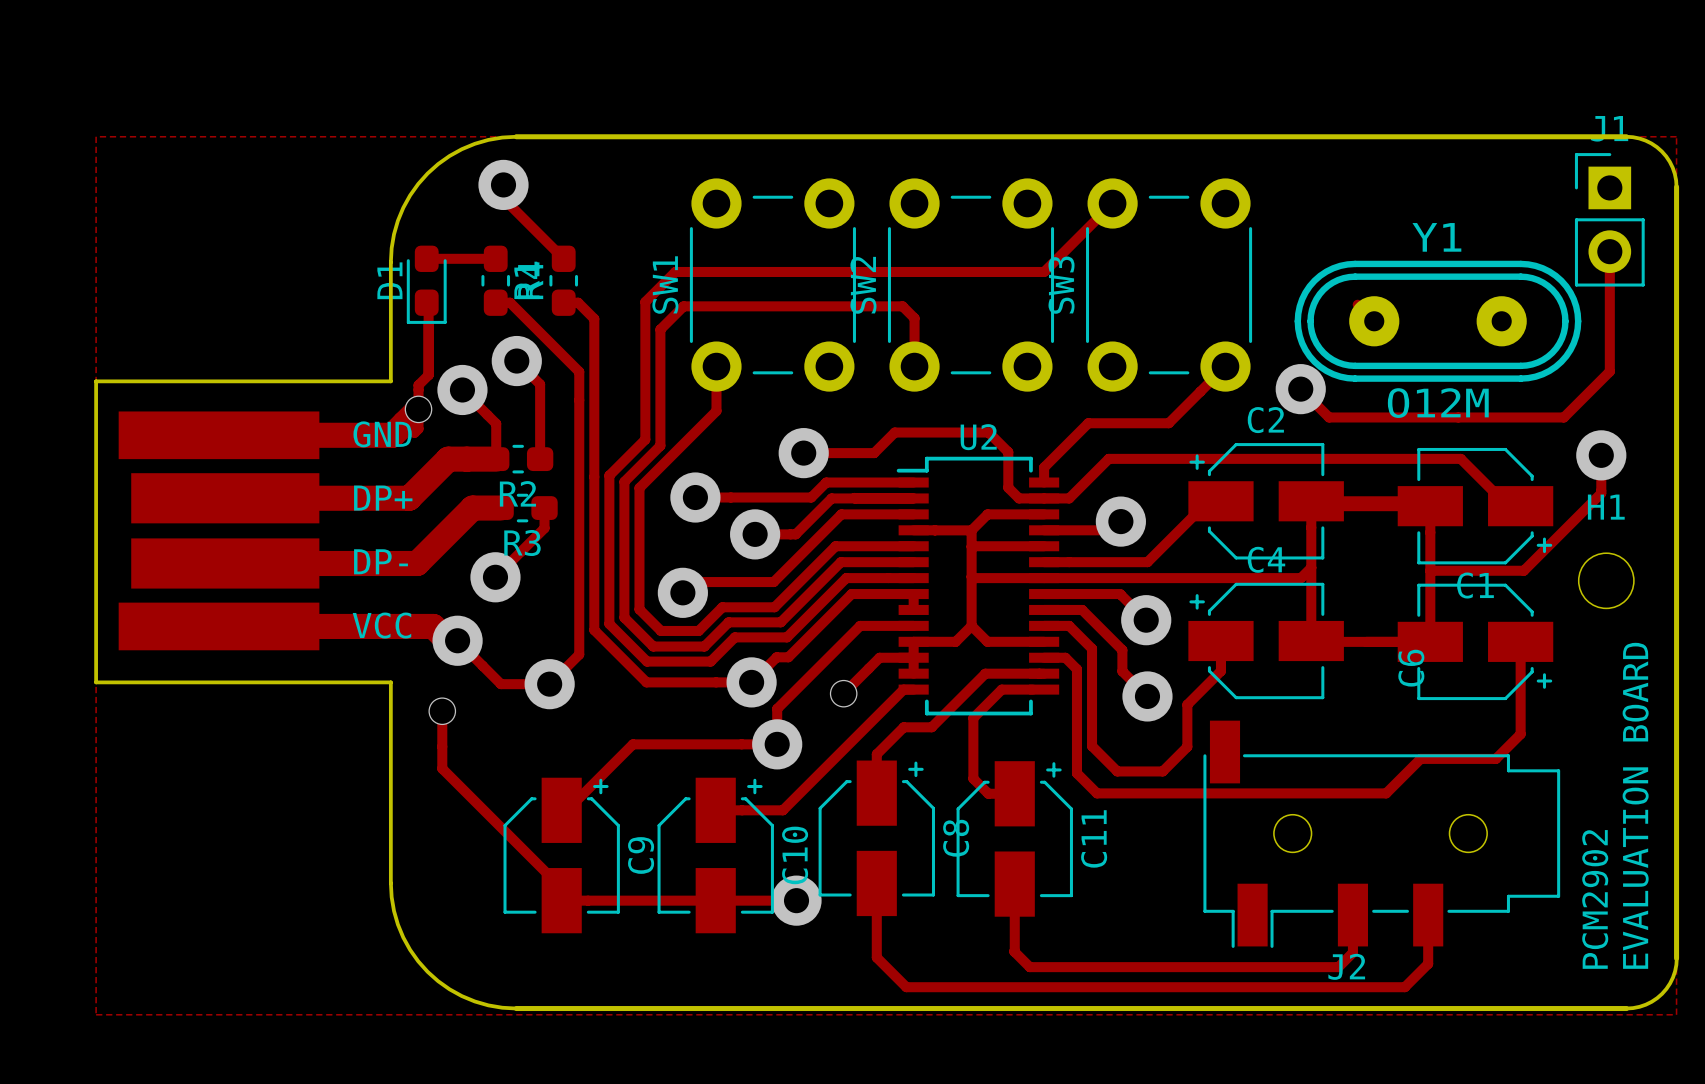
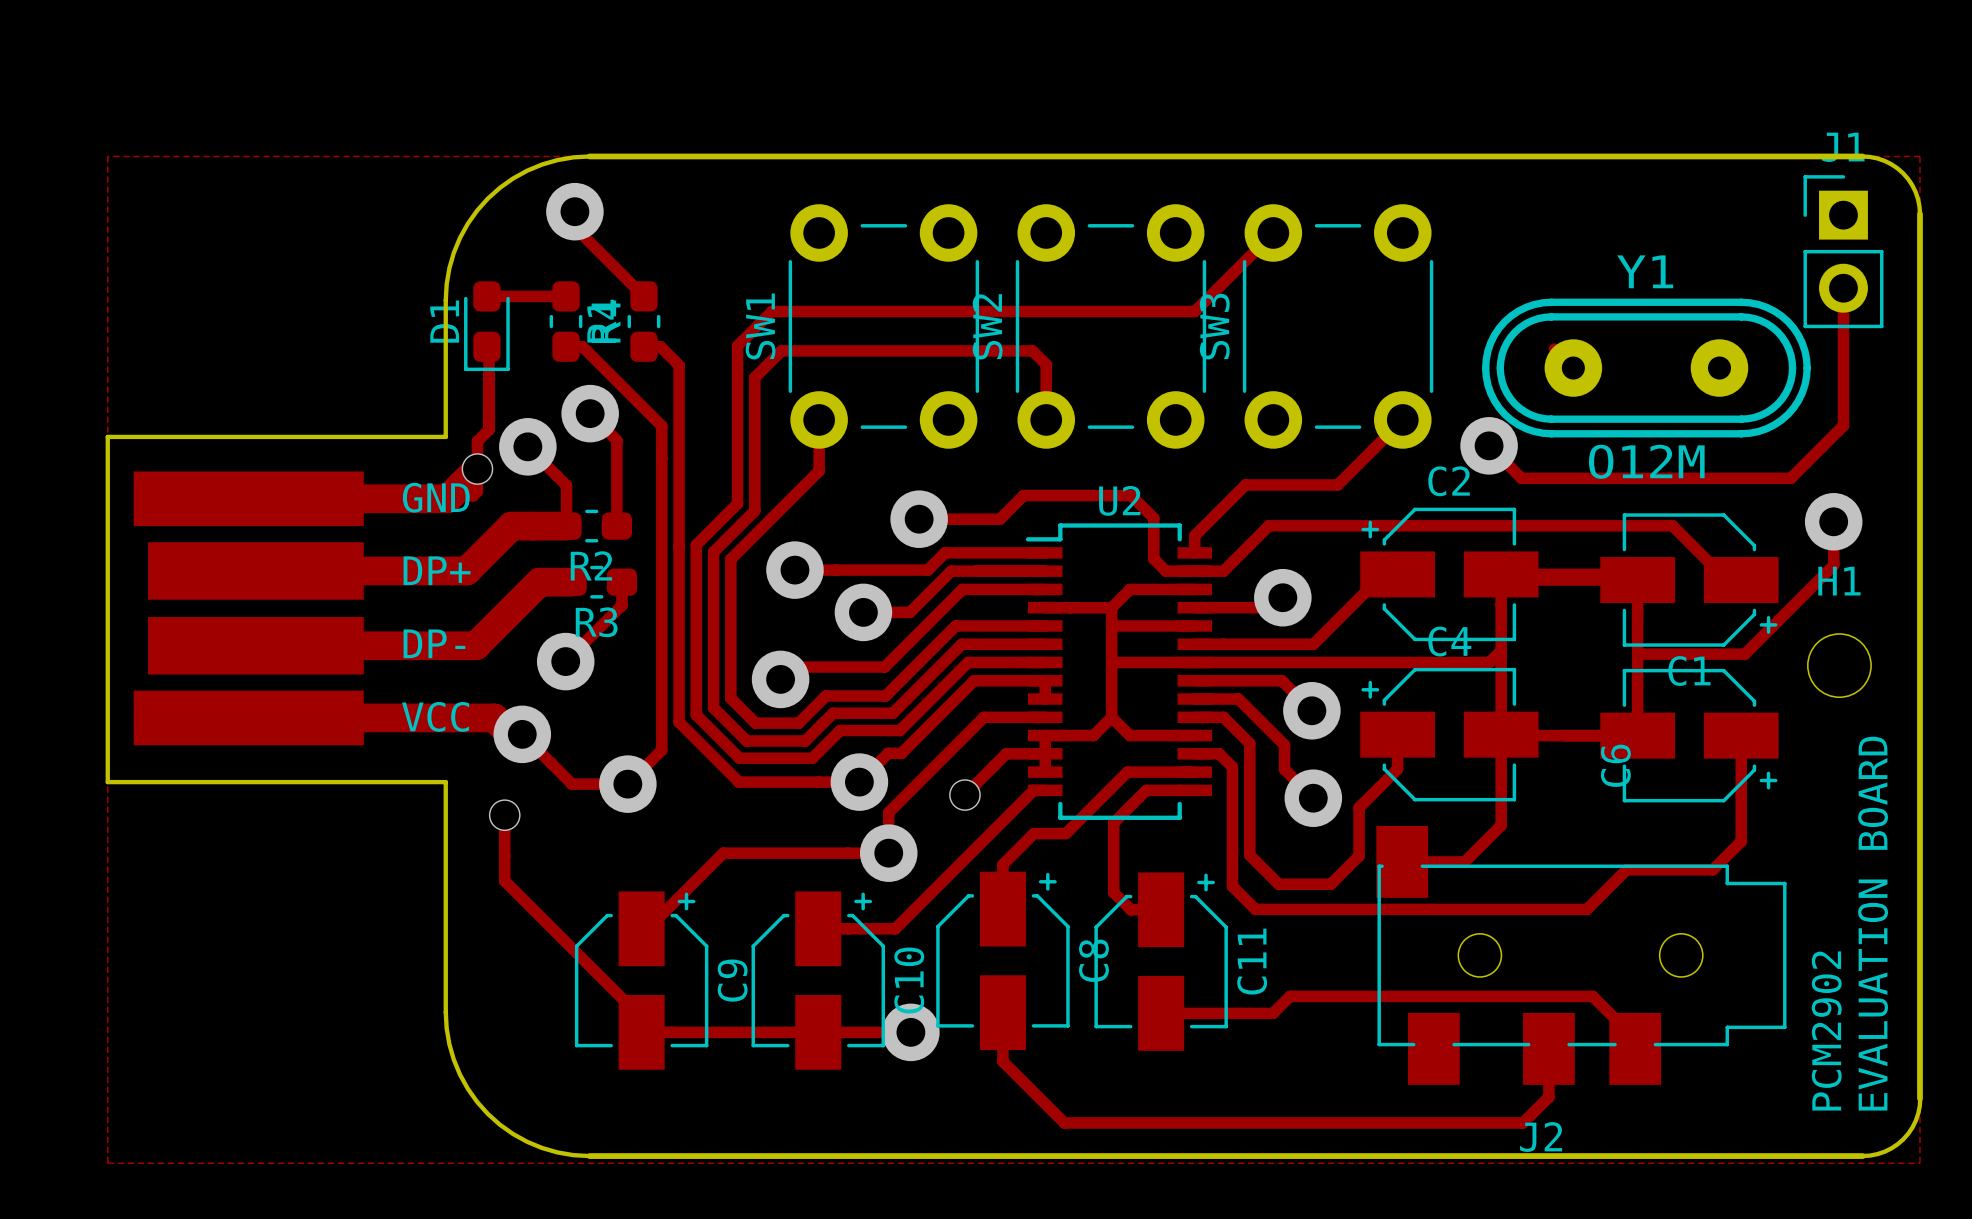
track: none -> (1501, 734) (1501, 825) (1464, 861) (1402, 861)
J2 footprint: [1203, 720, 1561, 948] -> [1376, 825, 1787, 1085]
track: (1014, 884) (1014, 951) (1029, 967) (1338, 967) (1352, 952) -> (1161, 1013) (1273, 1013) (1290, 996) (1592, 996) (1635, 1038) (1635, 1048)
track: (1428, 915) (1428, 963) (1404, 987) (906, 987) (876, 957) (876, 926) -> (1548, 1092) (1548, 1097) (1523, 1122) (1064, 1122) (1002, 1061)

